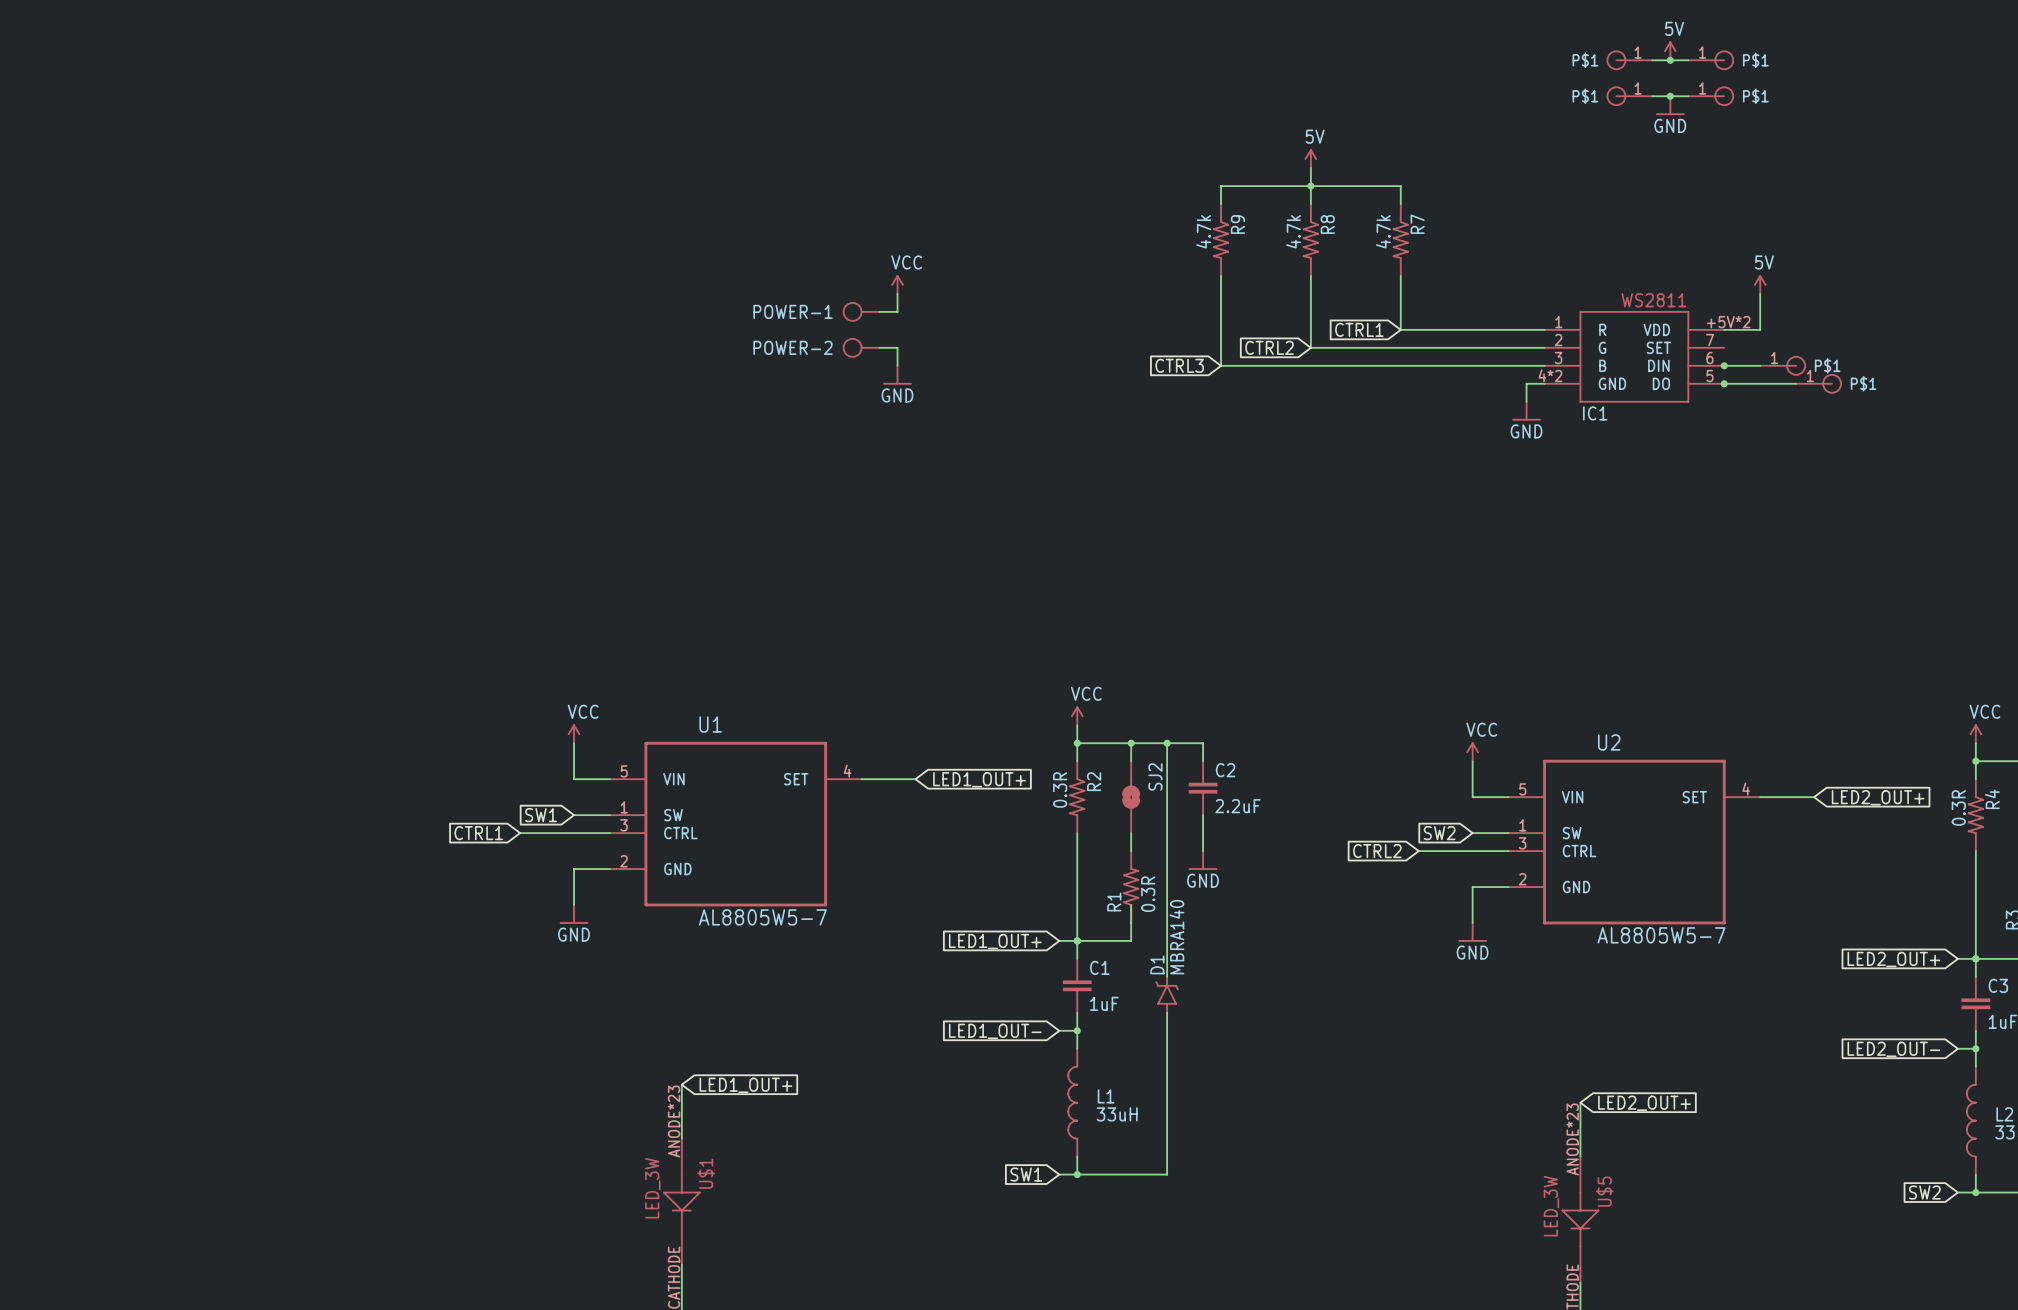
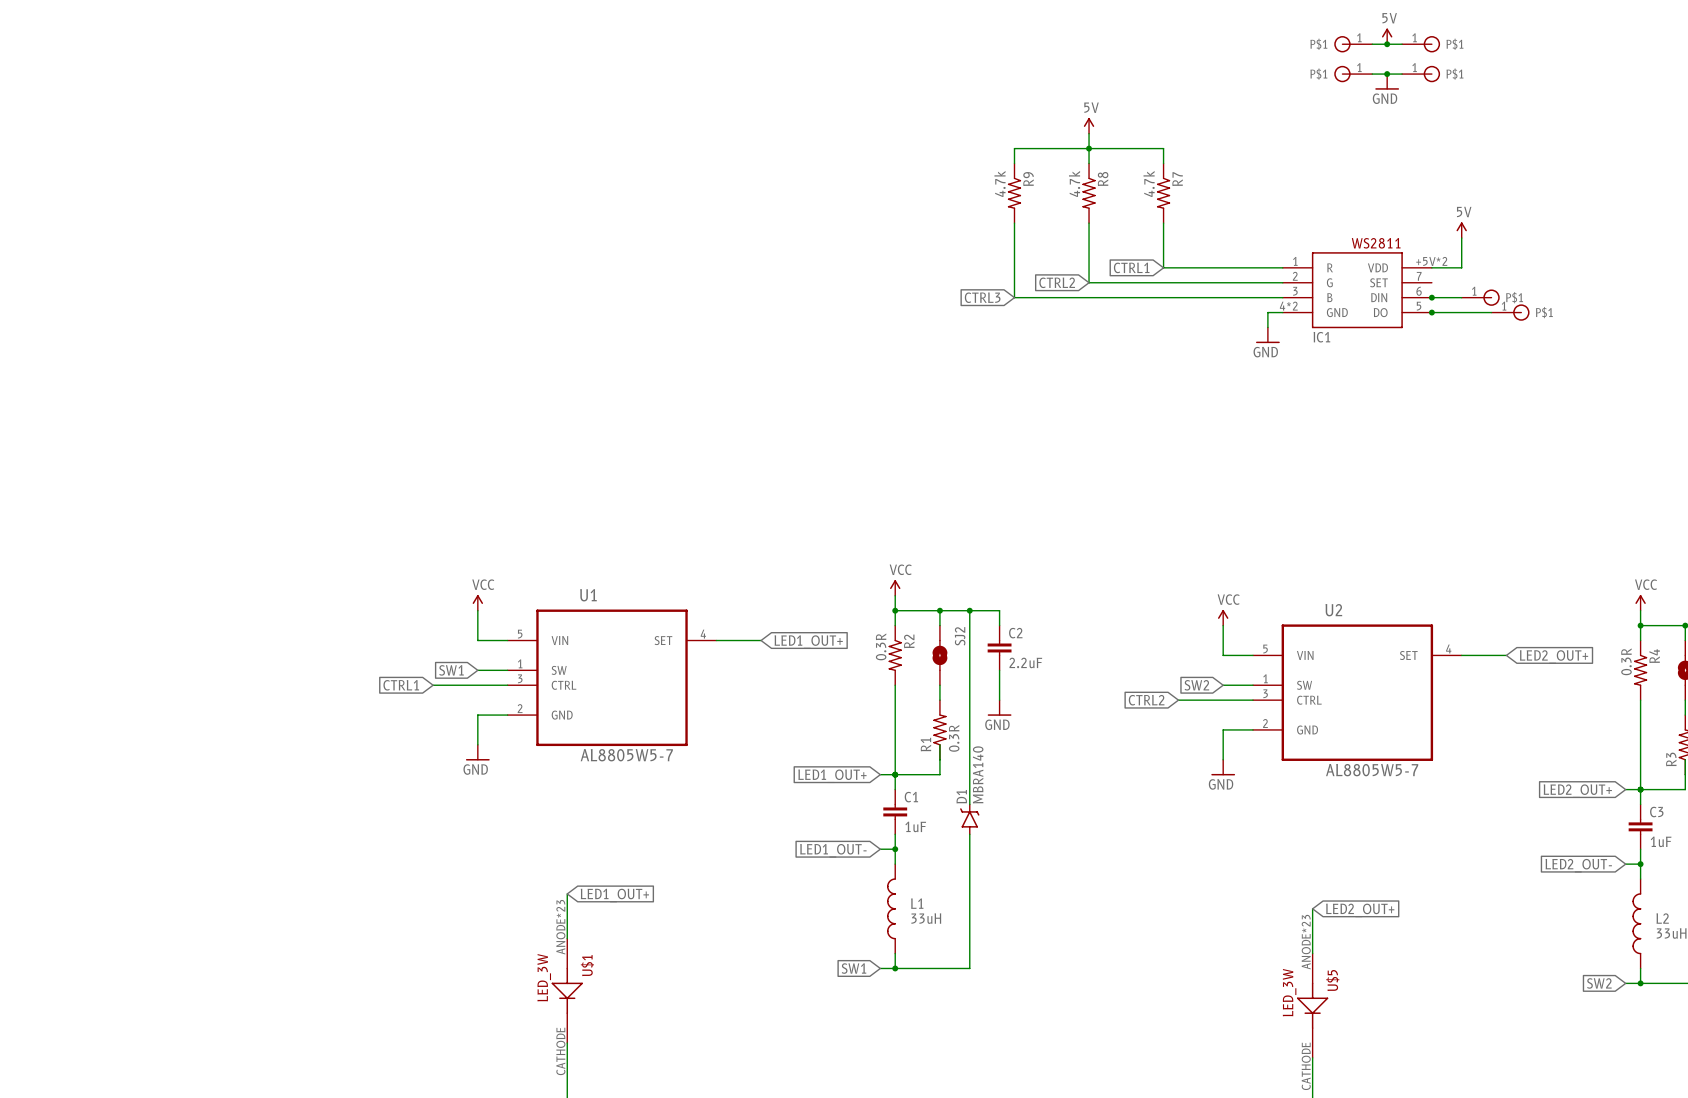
power symbol: VCC (897, 284) -> none
wire: (897, 293) (897, 311) (879, 311) -> none
POWER-1: (861, 311) -> none
POWER-2: (861, 347) -> none
wire: (879, 347) (897, 347) (897, 365) -> none
power symbol: GND (897, 375) -> none

